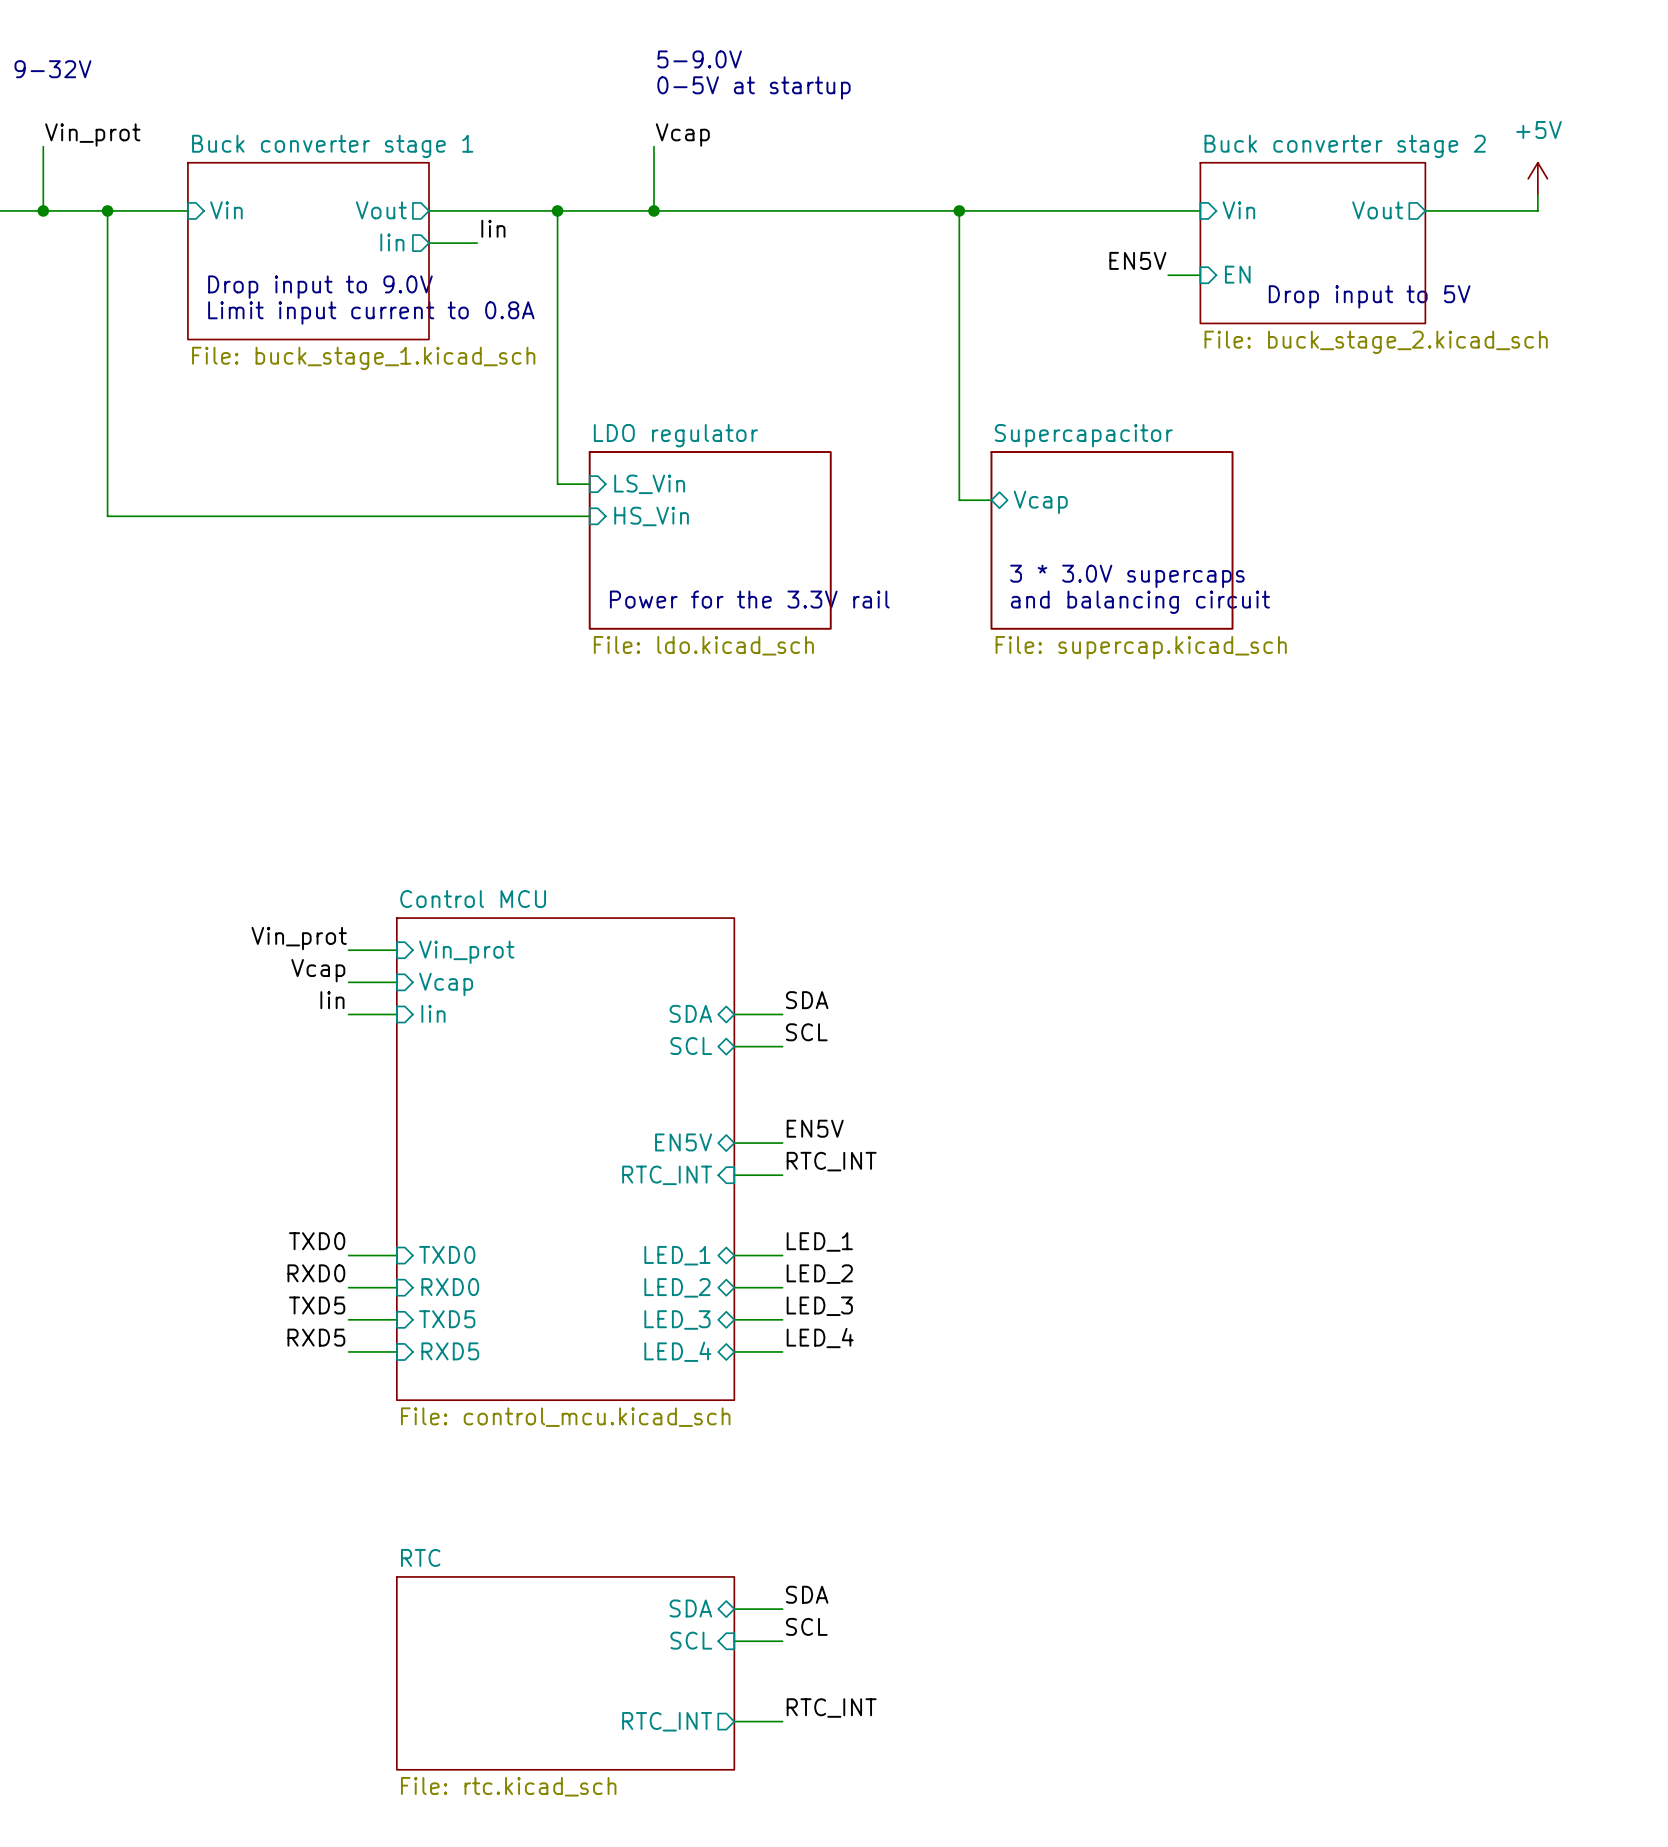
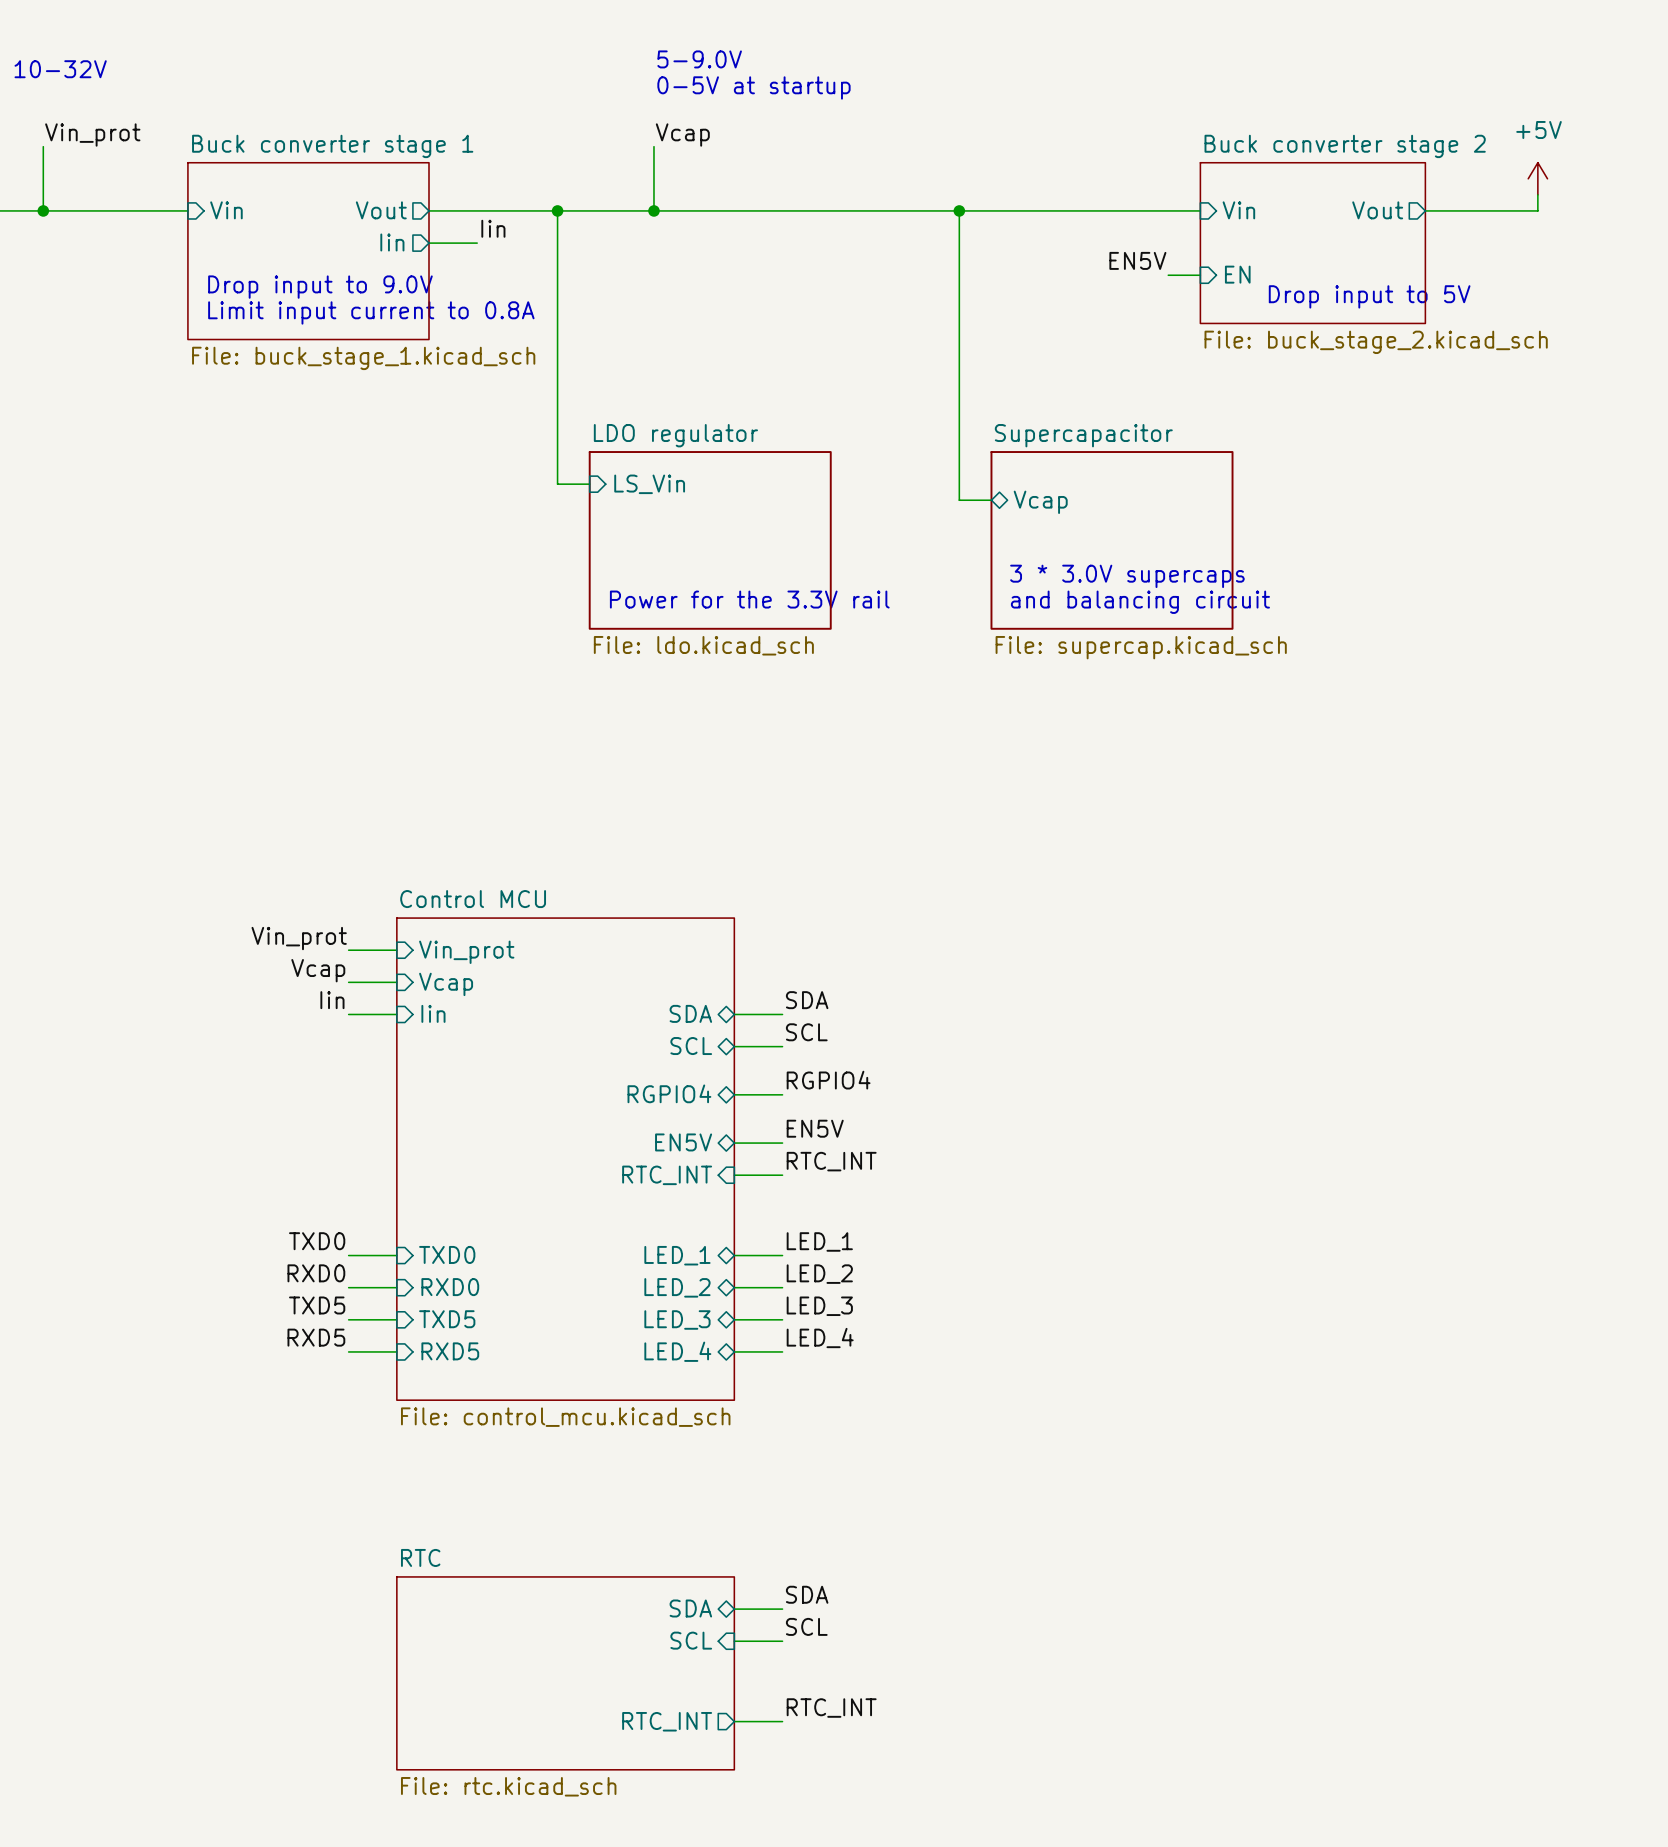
text: 9-32V (52, 69) -> 10-32V (60, 69)
wire: (107, 210) (107, 516) (589, 516) -> none
junction: (107, 210) -> none
sheet pin: HS_Vin (651, 516) -> none
label: none -> RGPIO4 (828, 1080)
sheet pin: none -> RGPIO4 (669, 1093)
wire: none -> (734, 1094) (782, 1094)

